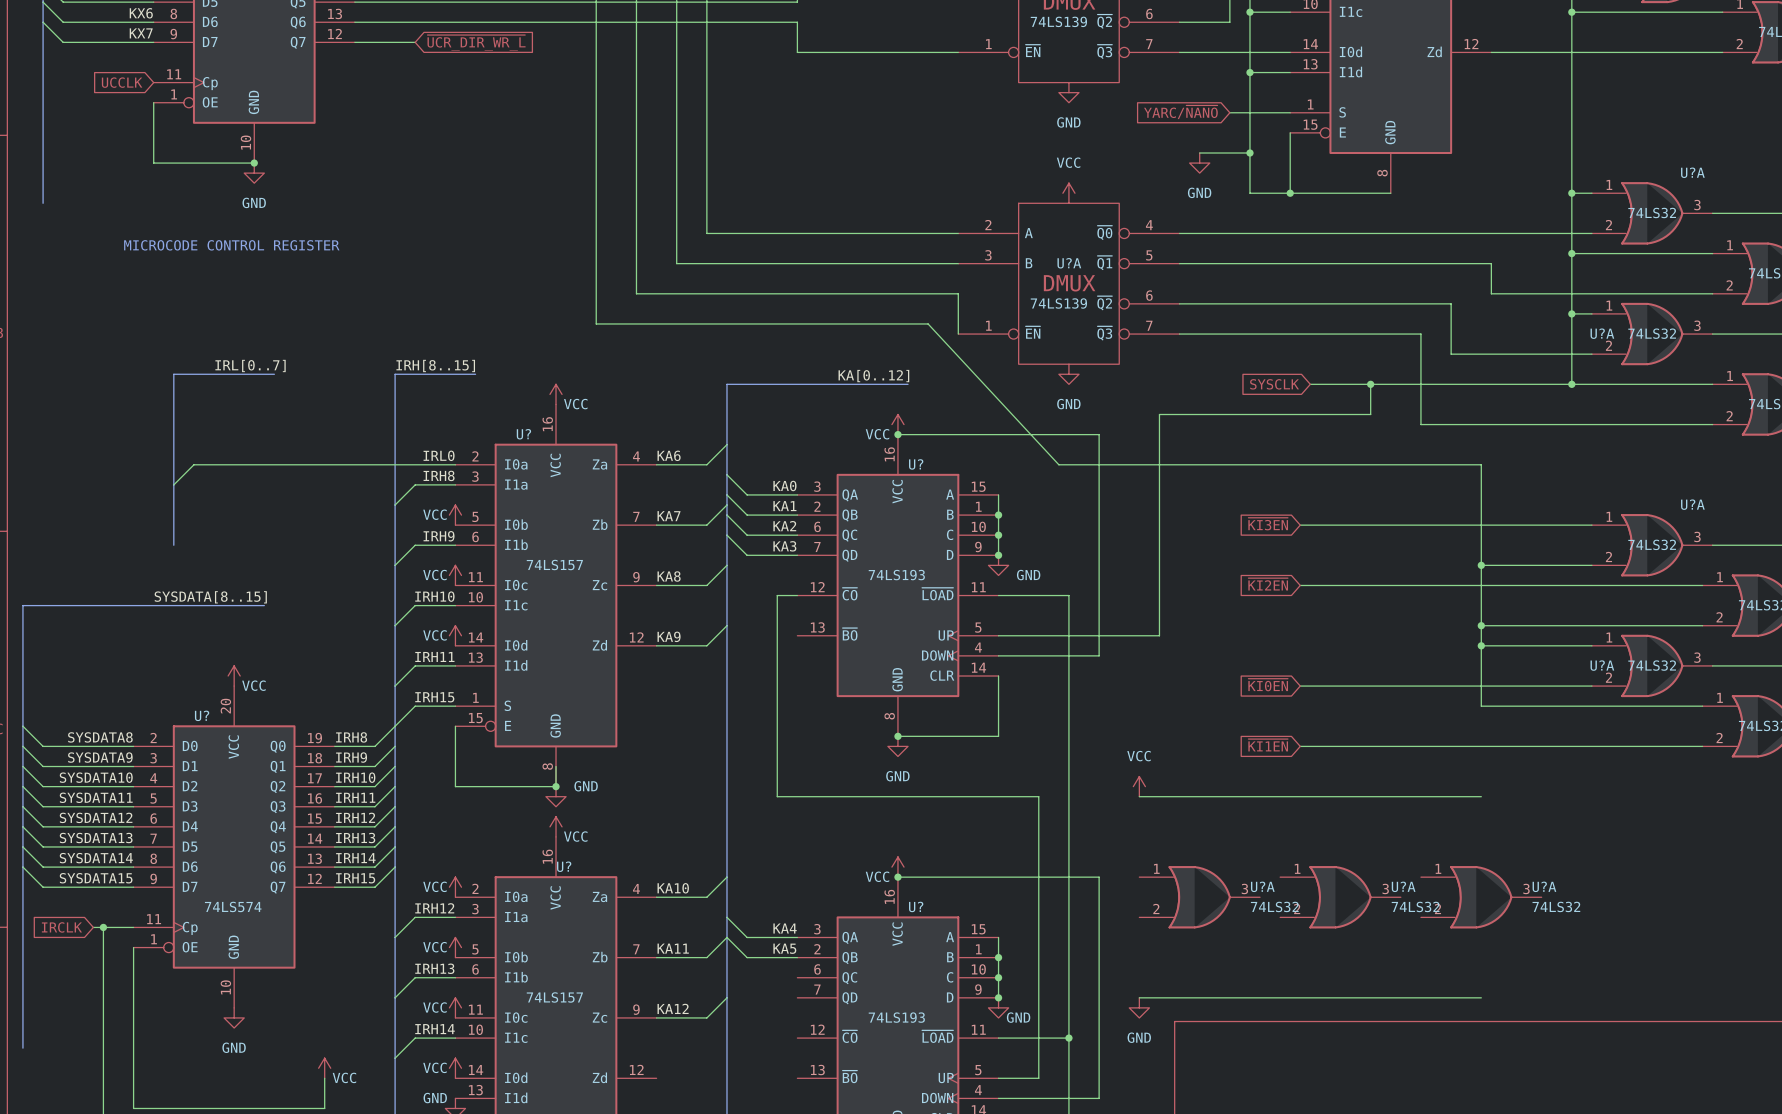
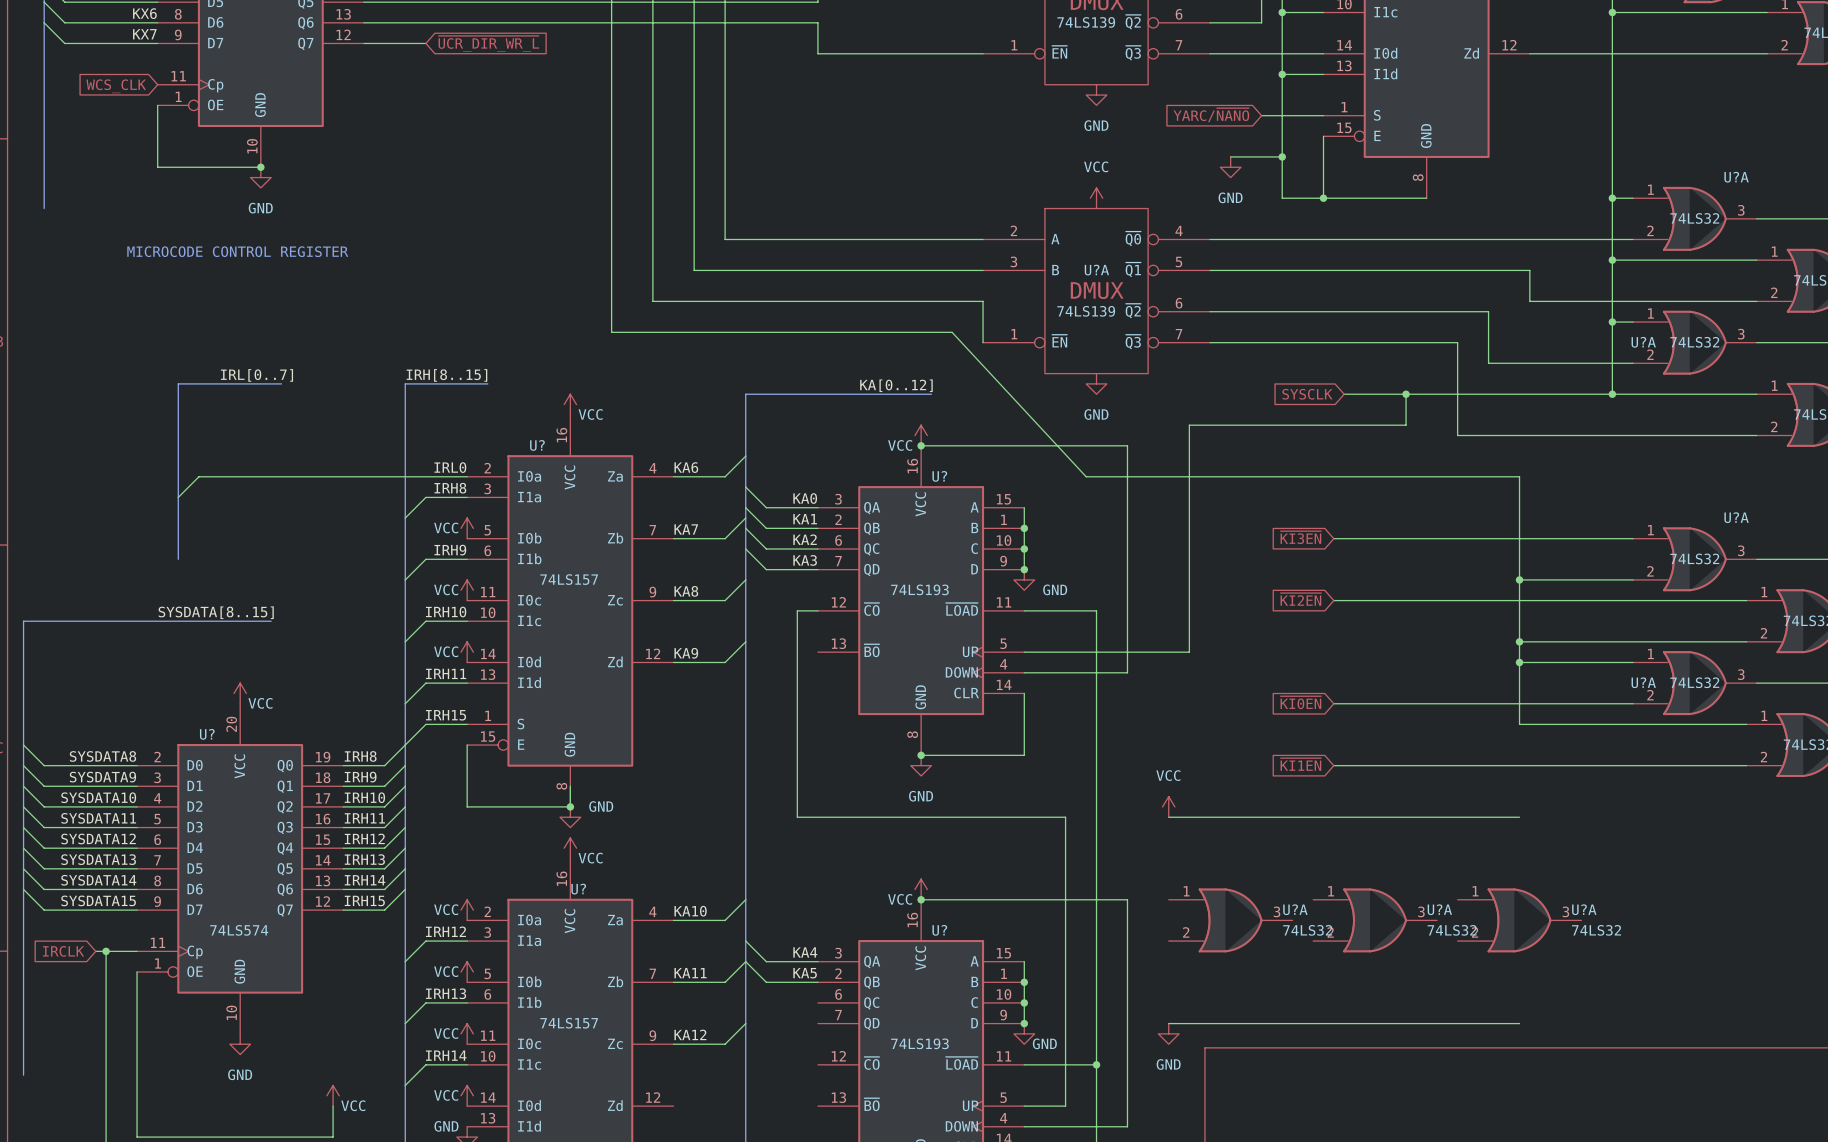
global label: UCCLK (122, 82) -> WCS_CLK (116, 86)

